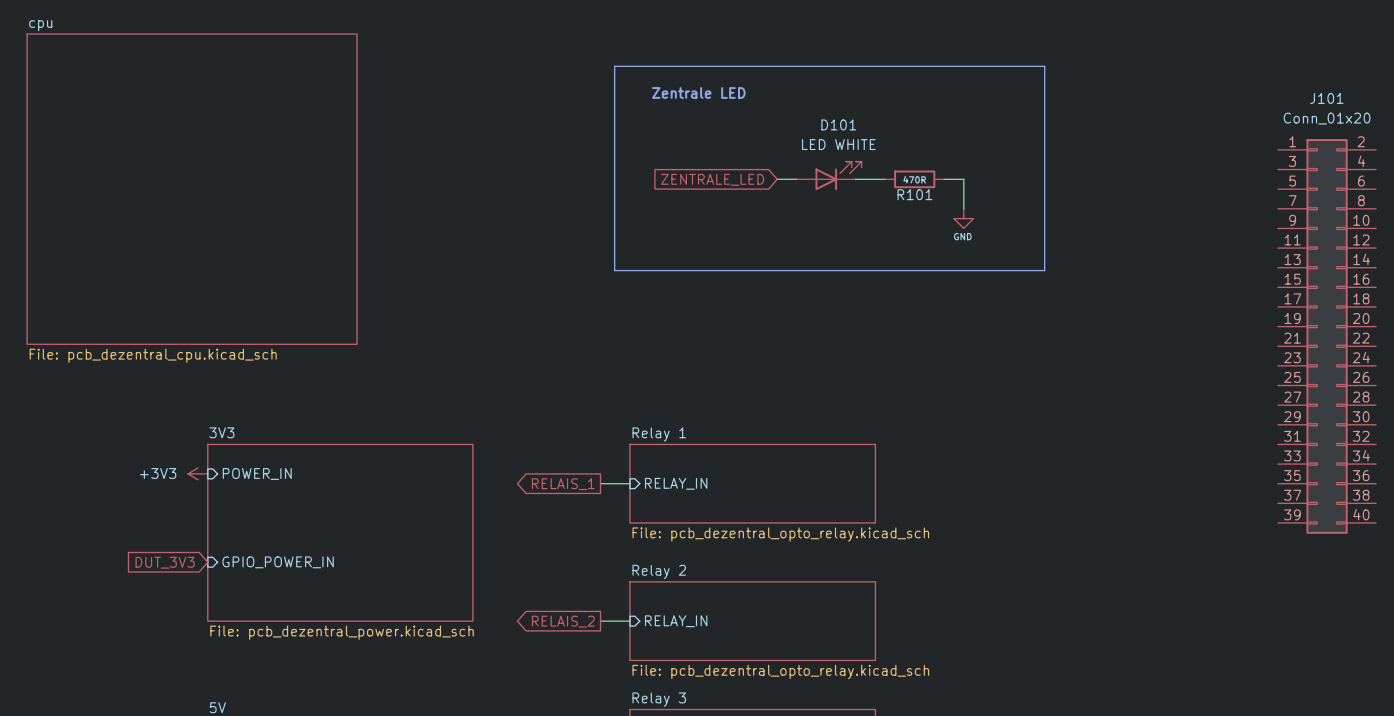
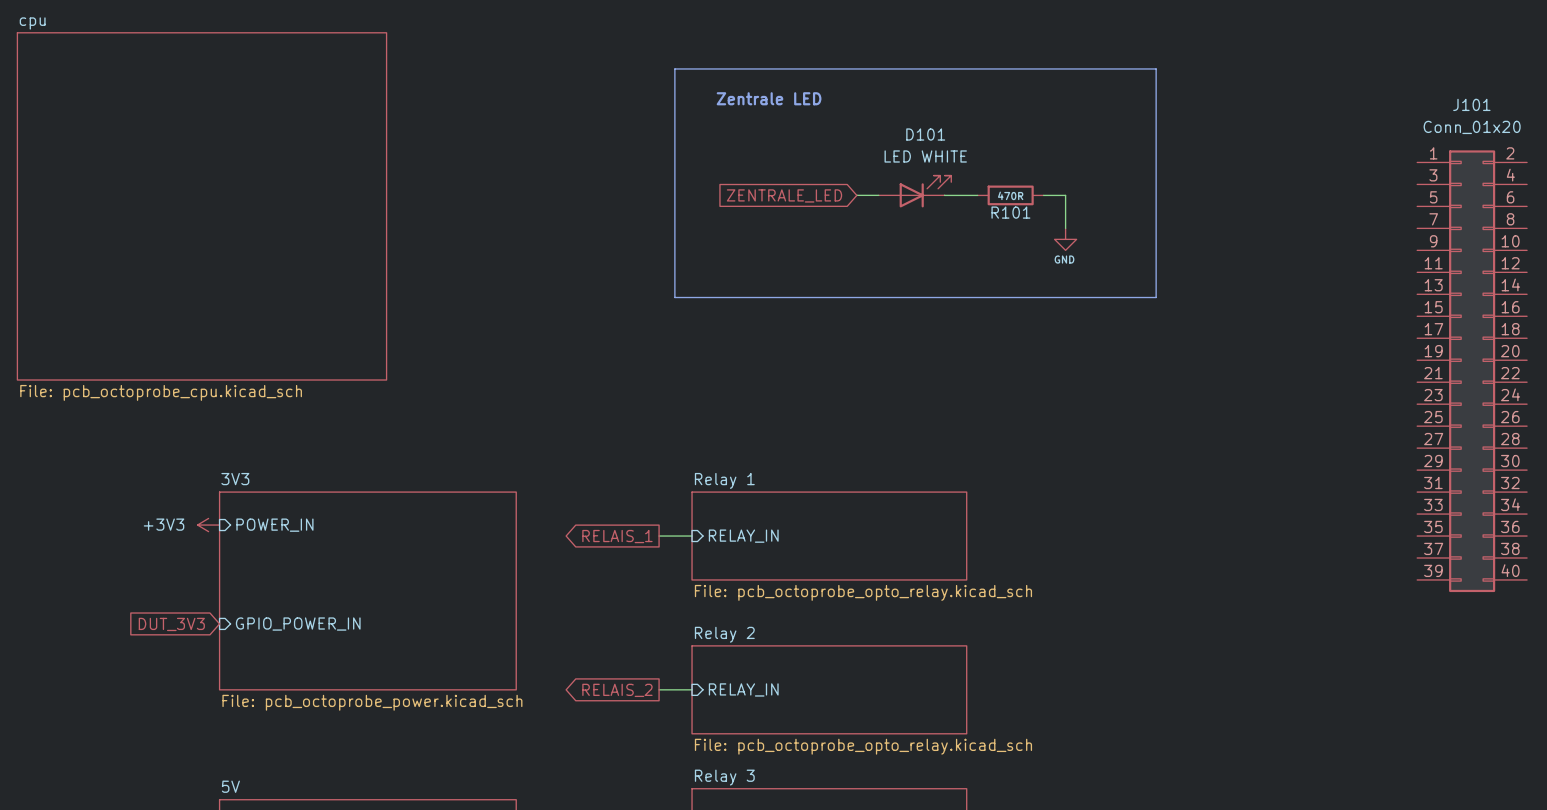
sheet cpu value: File: pcb_dezentral_cpu.kicad_sch (153, 355) -> File: pcb_octoprobe_cpu.kicad_sch (161, 392)
sheet Relay 1 value: File: pcb_dezentral_opto_relay.kicad_sch (780, 534) -> File: pcb_octoprobe_opto_relay.kicad_sch (863, 592)
sheet 3V3 value: File: pcb_dezentral_power.kicad_sch (342, 632) -> File: pcb_octoprobe_power.kicad_sch (372, 702)
sheet Relay 2 value: File: pcb_dezentral_opto_relay.kicad_sch (780, 671) -> File: pcb_octoprobe_opto_relay.kicad_sch (863, 746)

